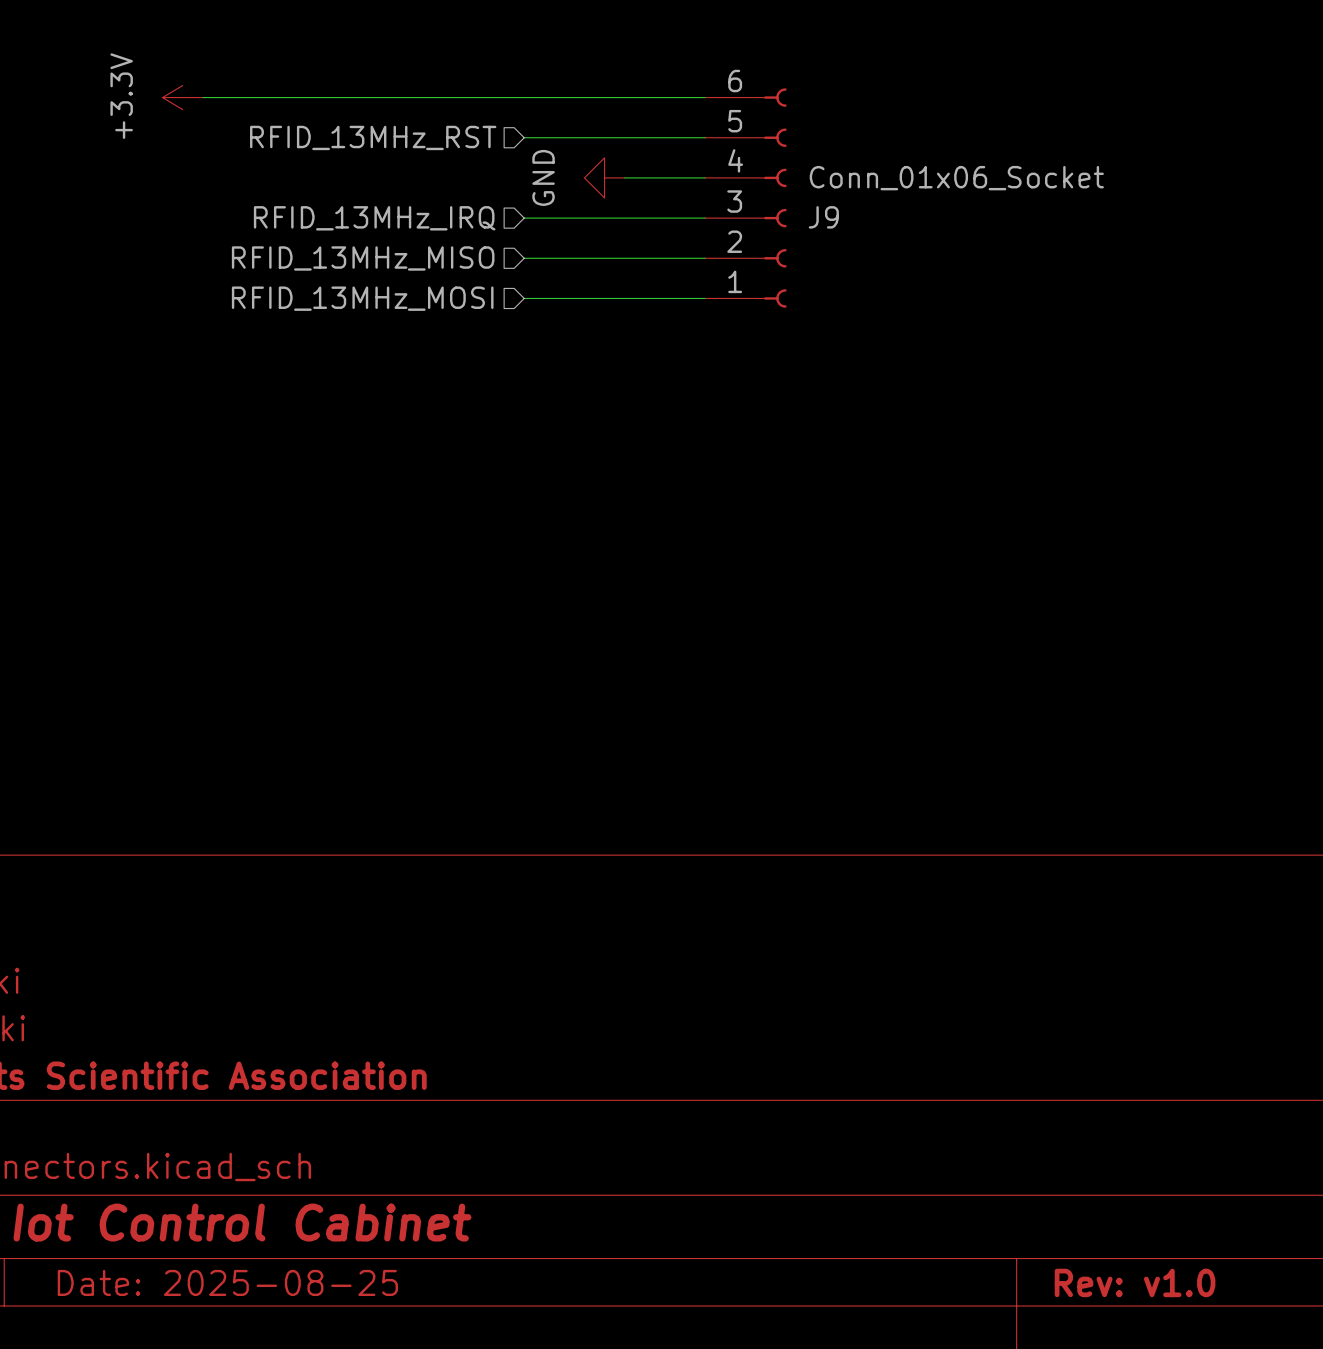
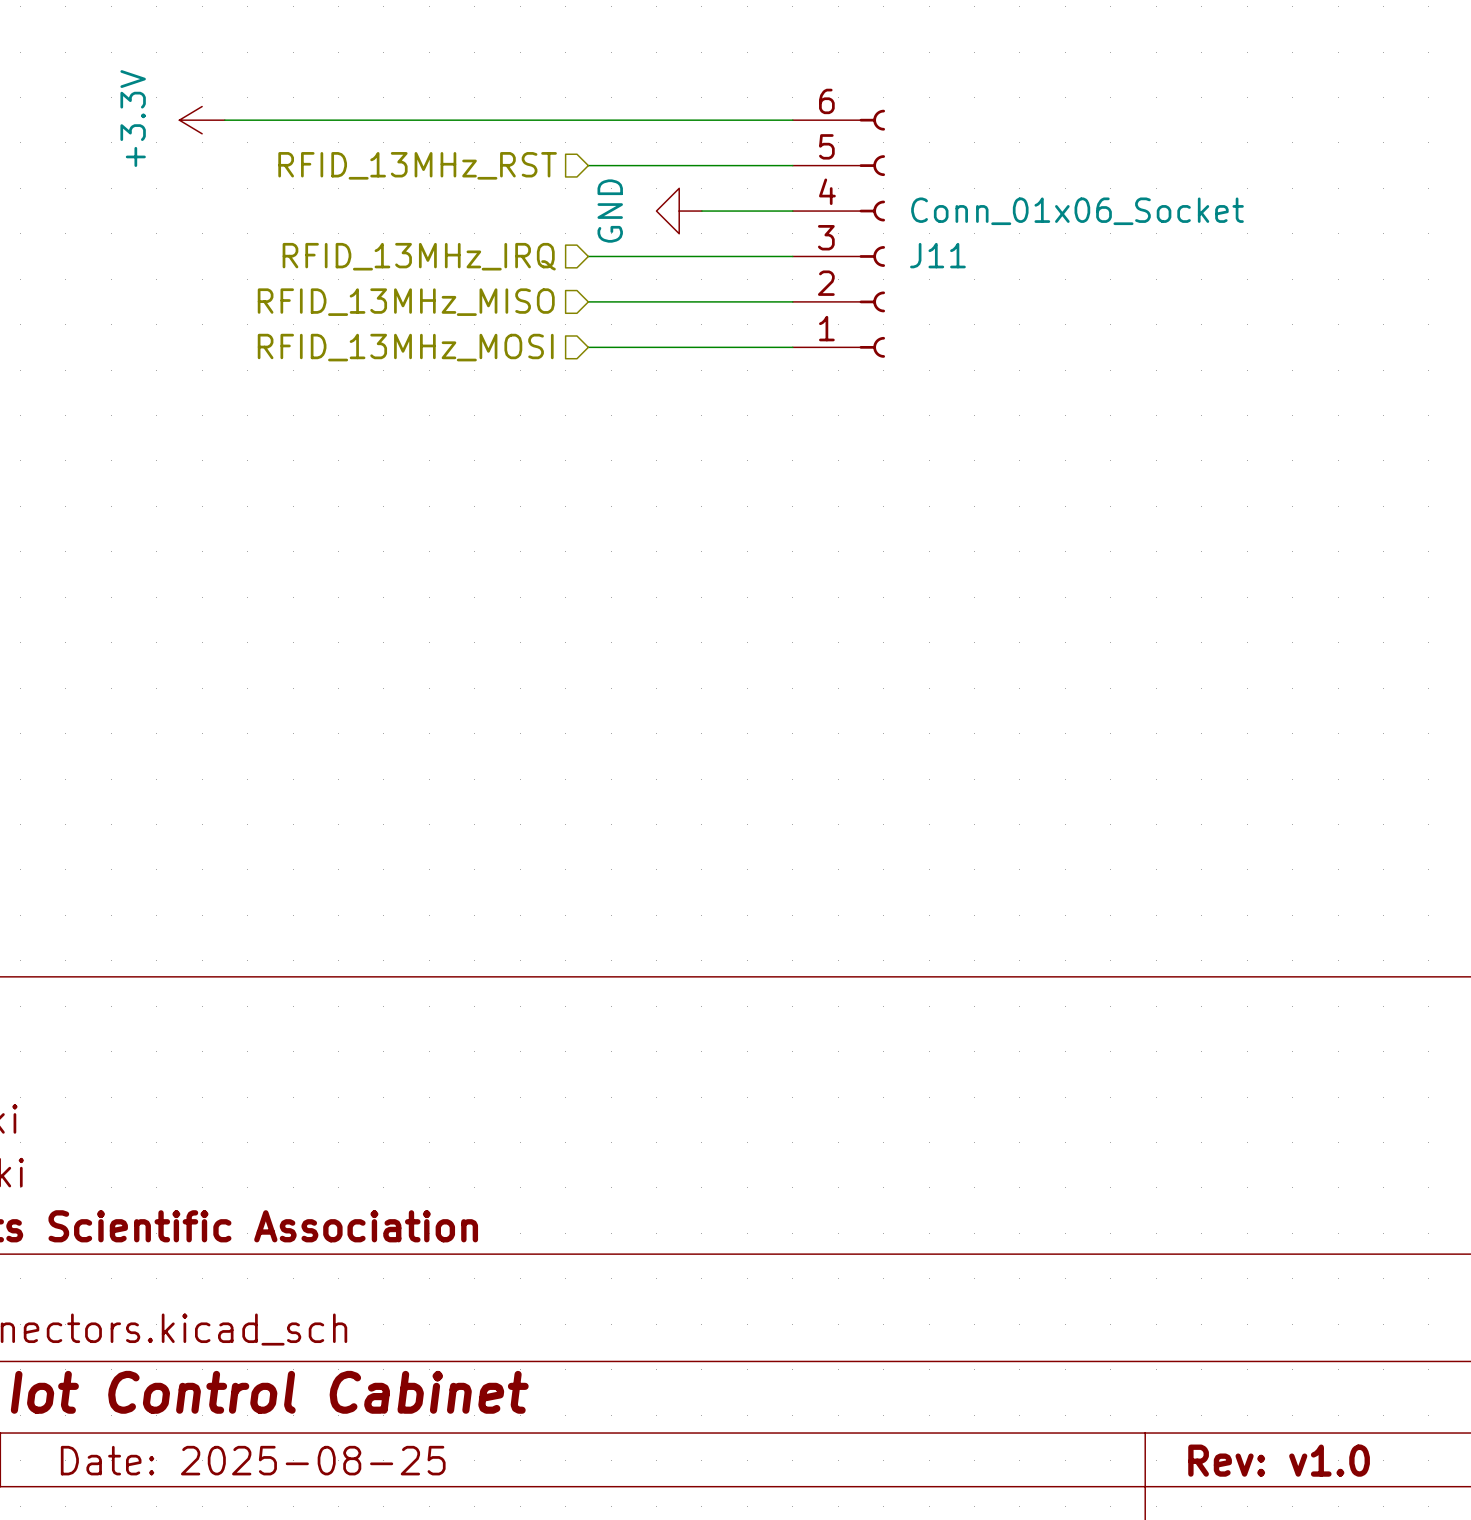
J9 name: J9 (823, 217) -> J11 (937, 255)

